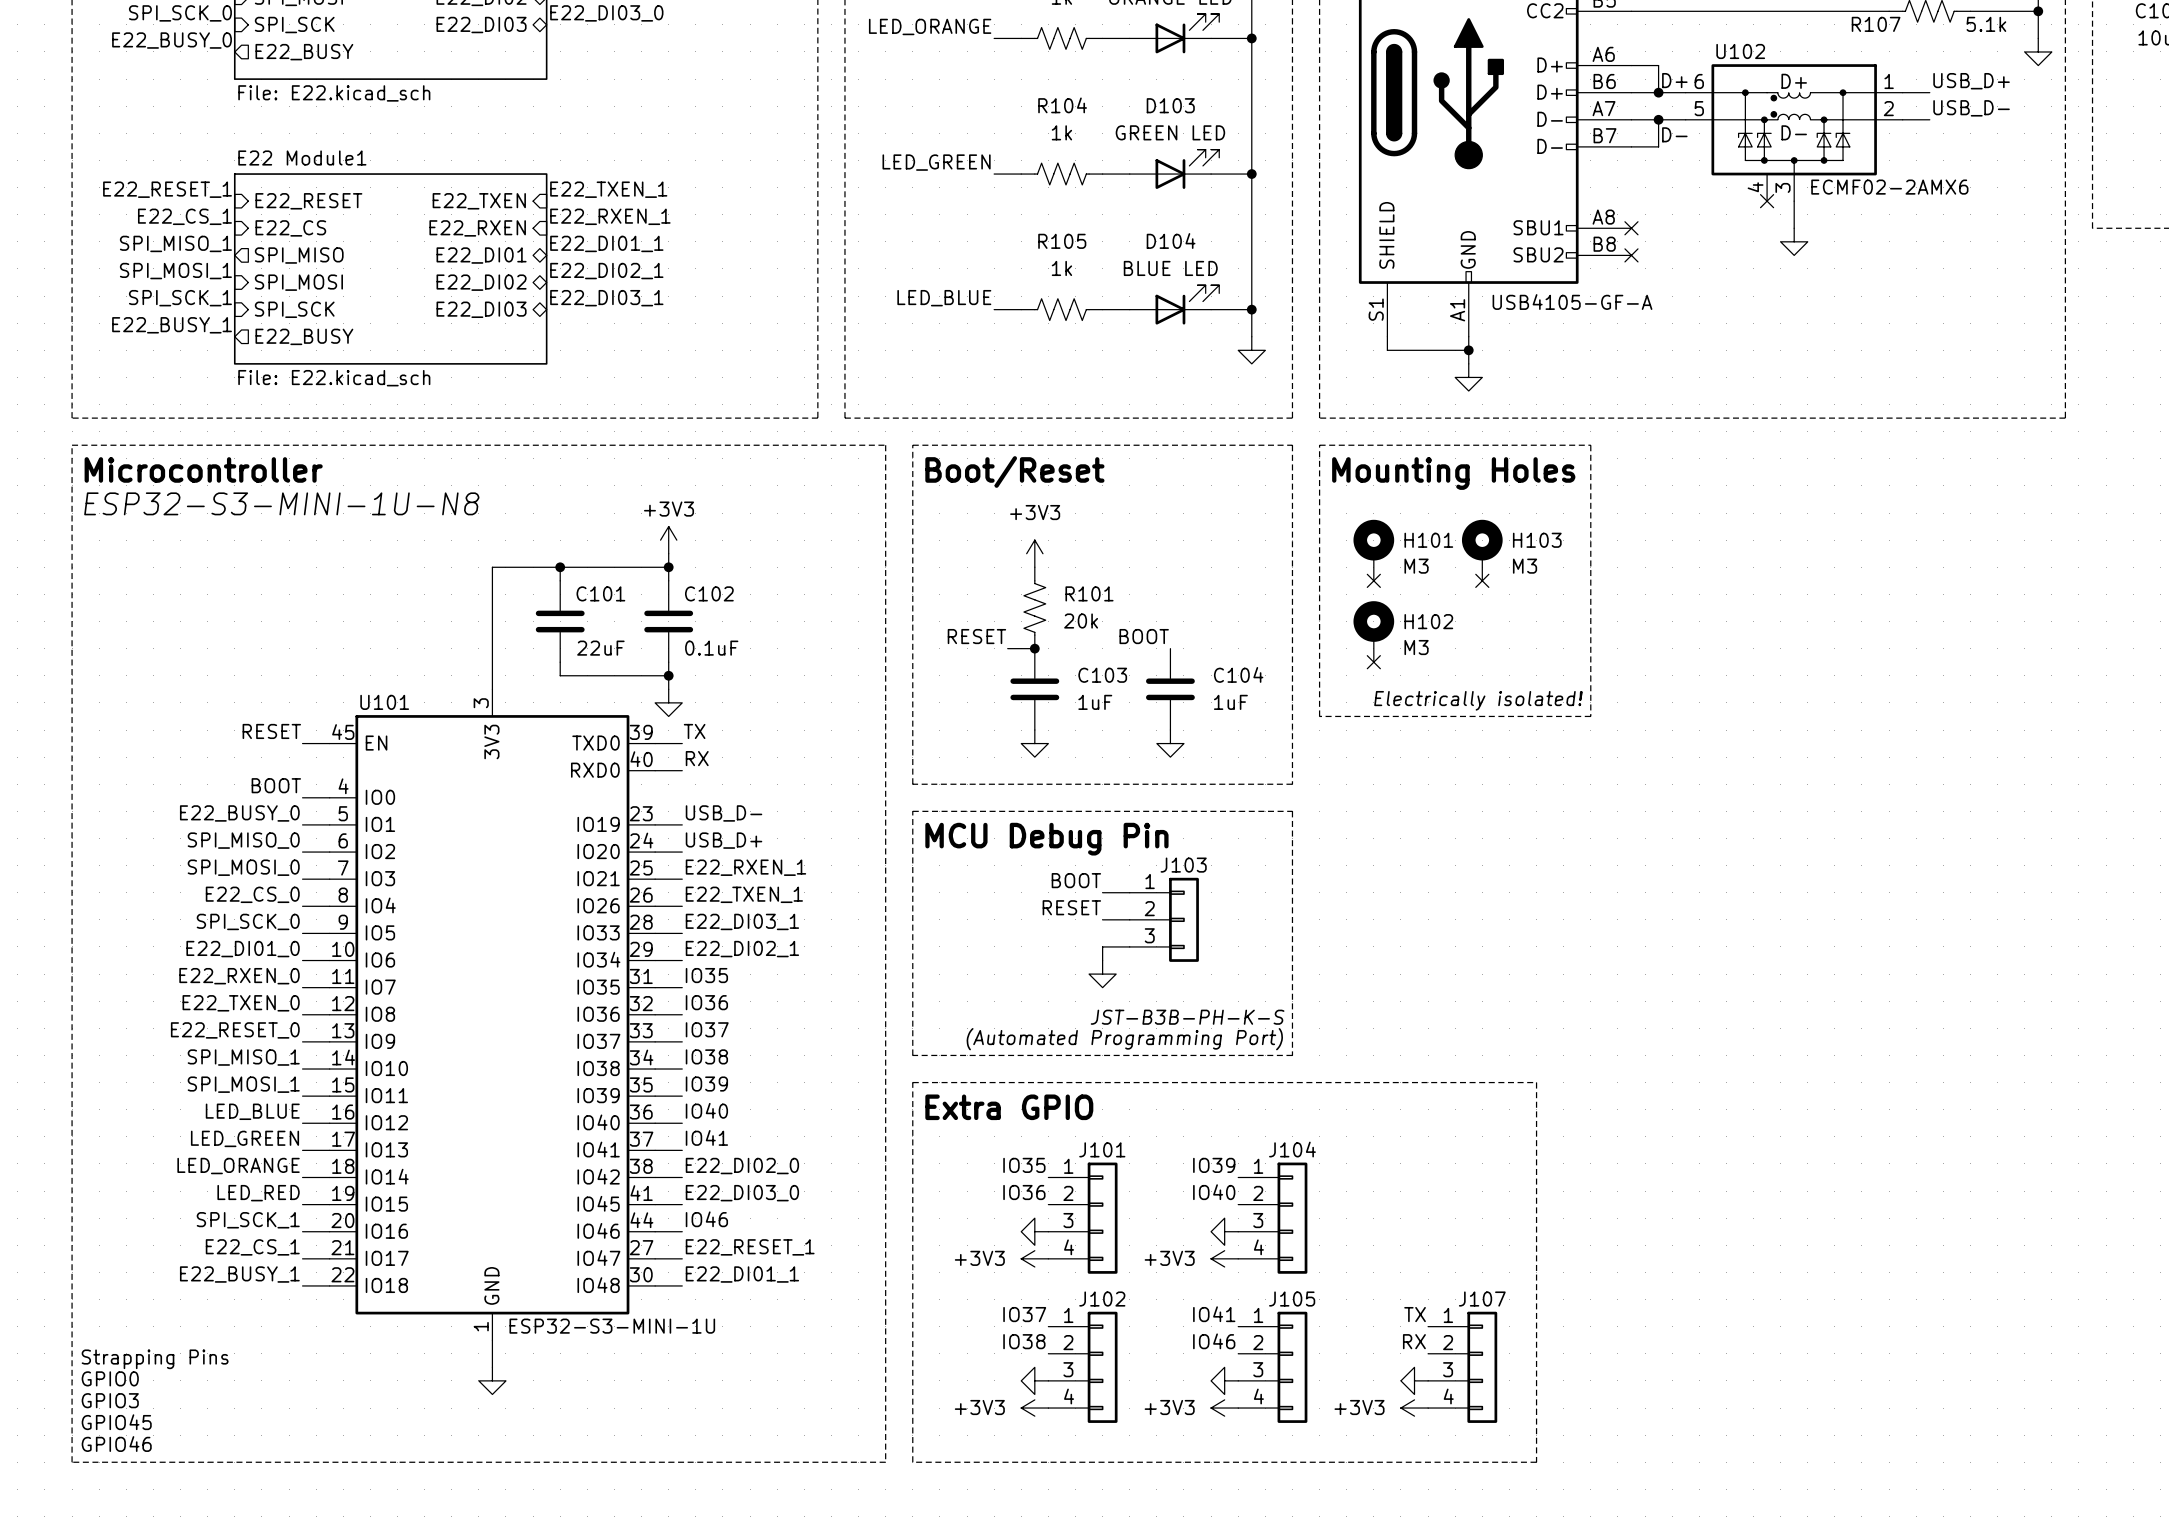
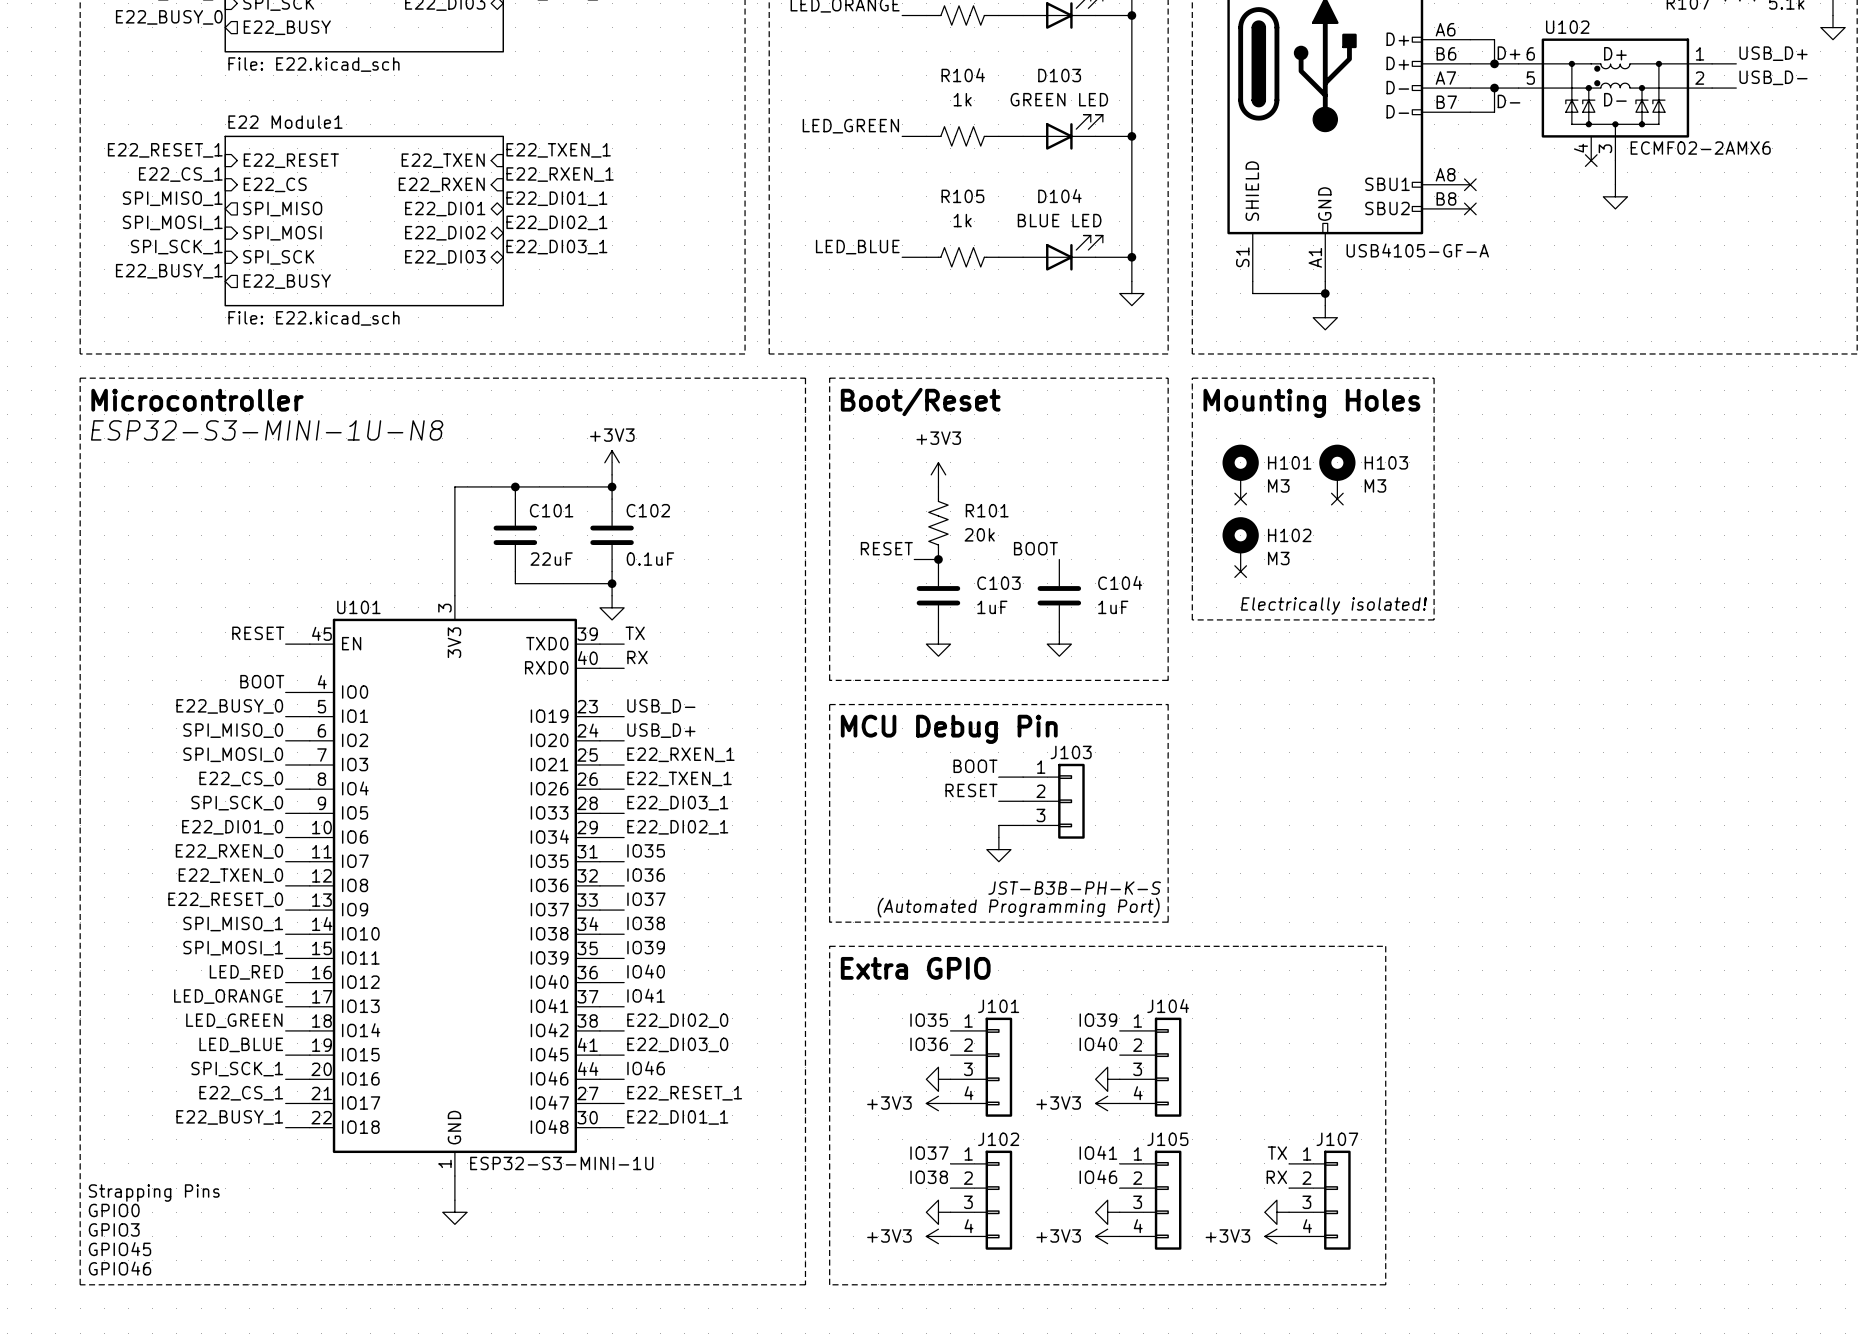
label: LED_BLUE (252, 1111) -> LED_RED (246, 972)
label: LED_GREEN (245, 1138) -> LED_ORANGE (228, 996)
label: LED_ORANGE (238, 1166) -> LED_GREEN (234, 1020)
label: LED_RED (258, 1193) -> LED_BLUE (241, 1044)

